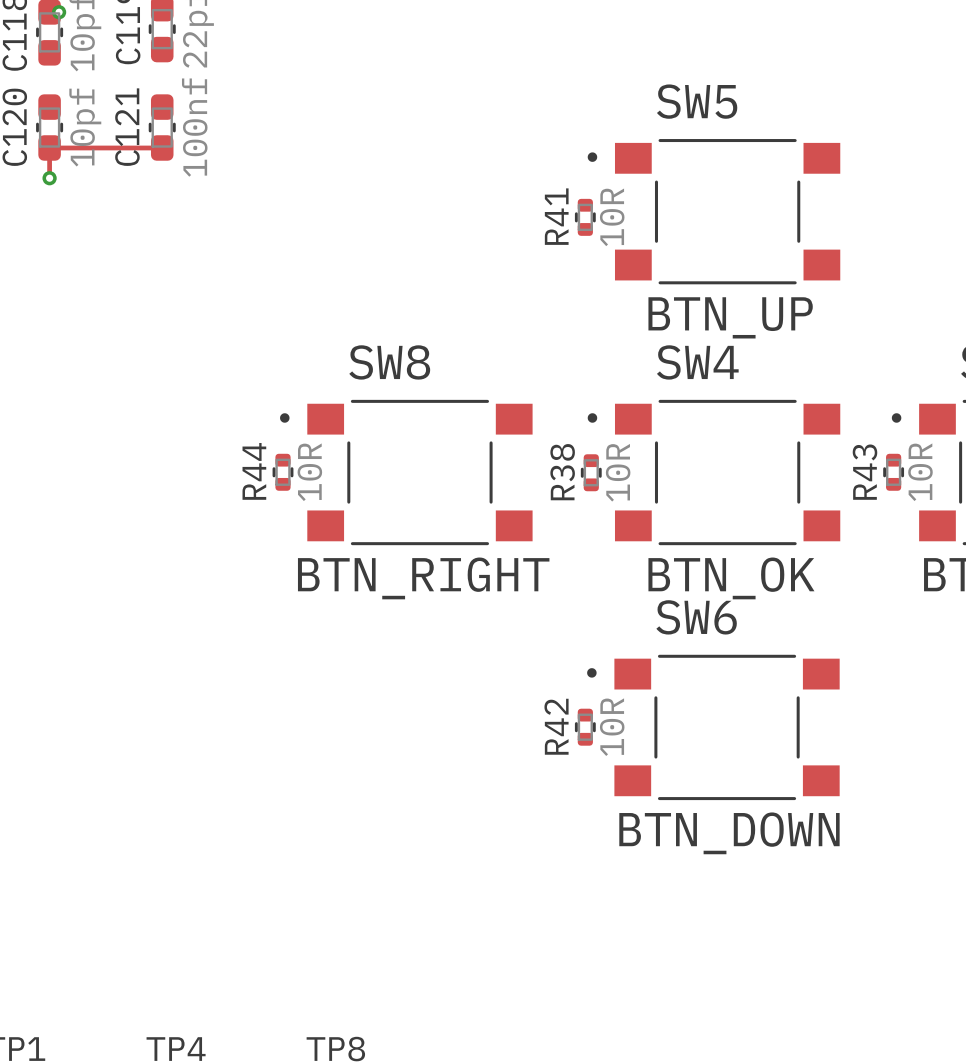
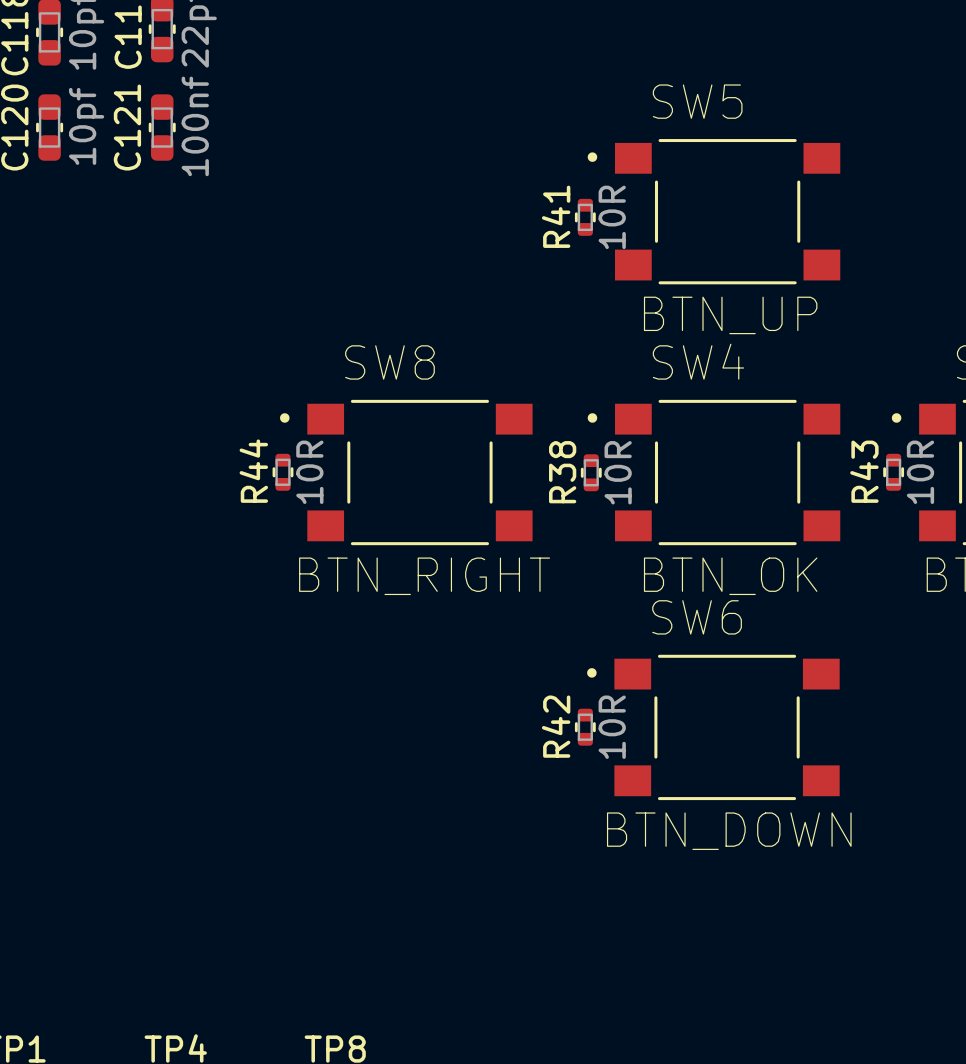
via: (59, 12) -> none
track: (162, 147) (49, 147) (49, 178) -> none
via: (49, 178) -> none

